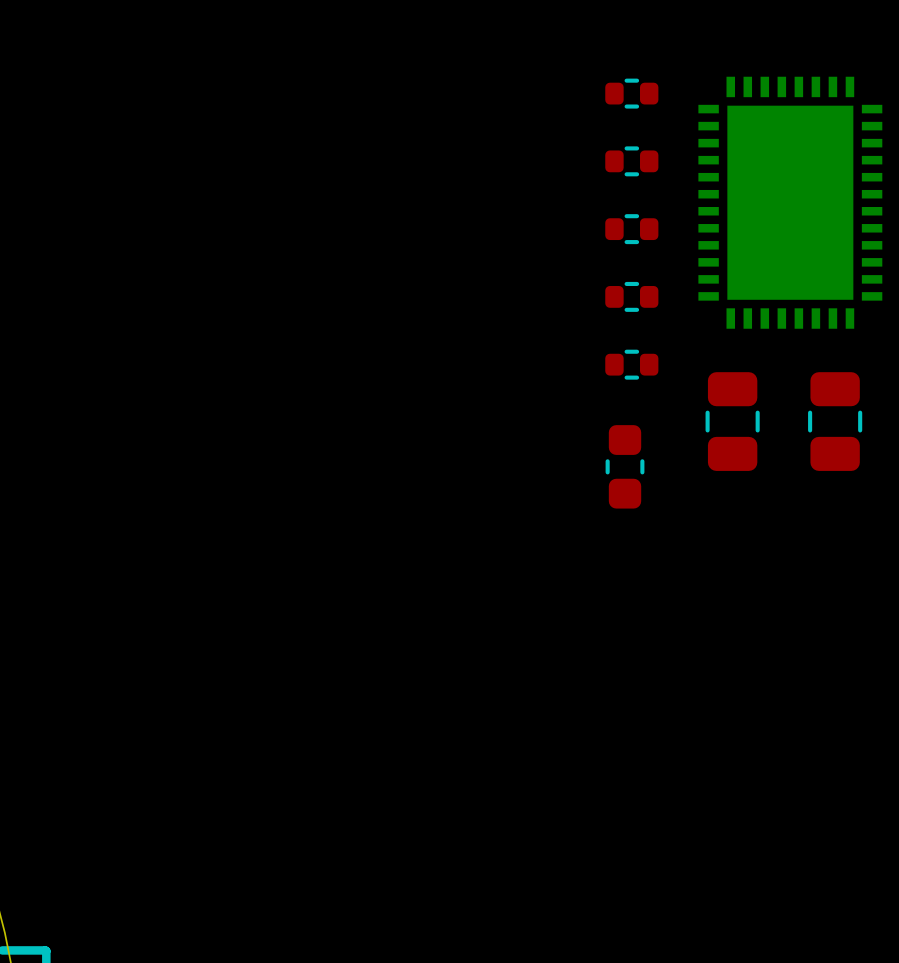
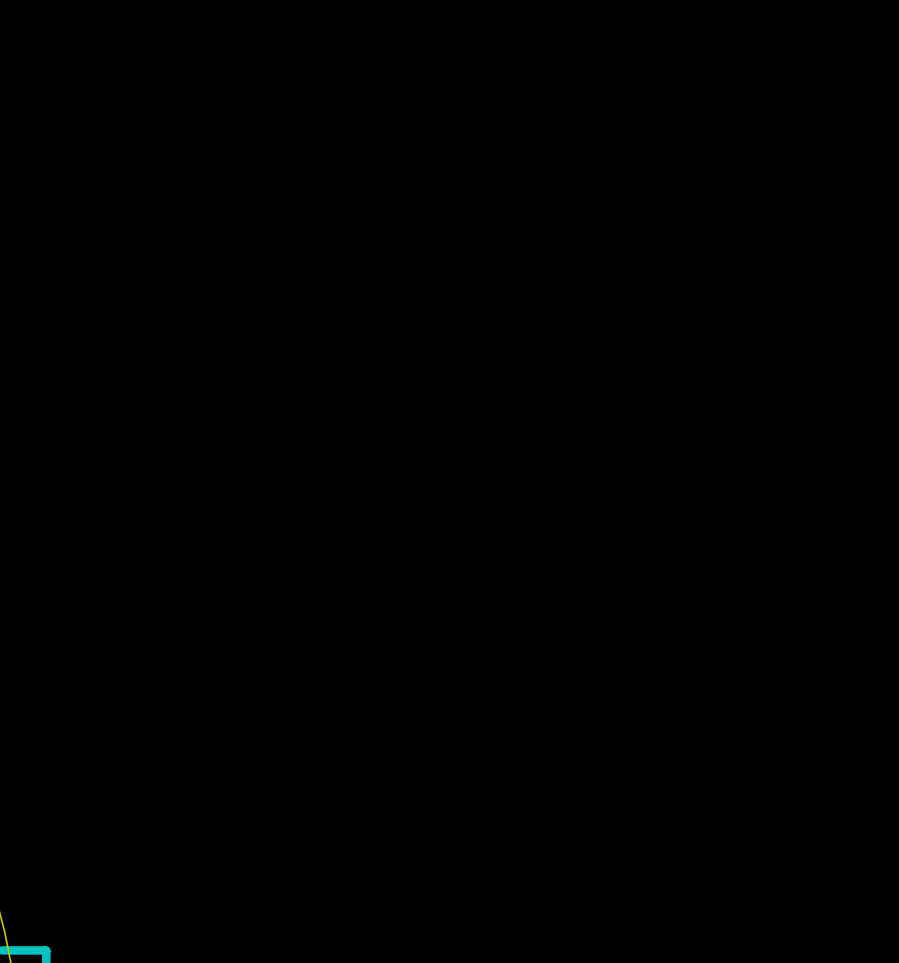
part: (631, 93) -> none
part: (631, 161) -> none
part: (790, 202) -> none
part: (631, 229) -> none
part: (631, 296) -> none
part: (631, 364) -> none
part: (732, 421) -> none
part: (835, 421) -> none
part: (625, 466) -> none

